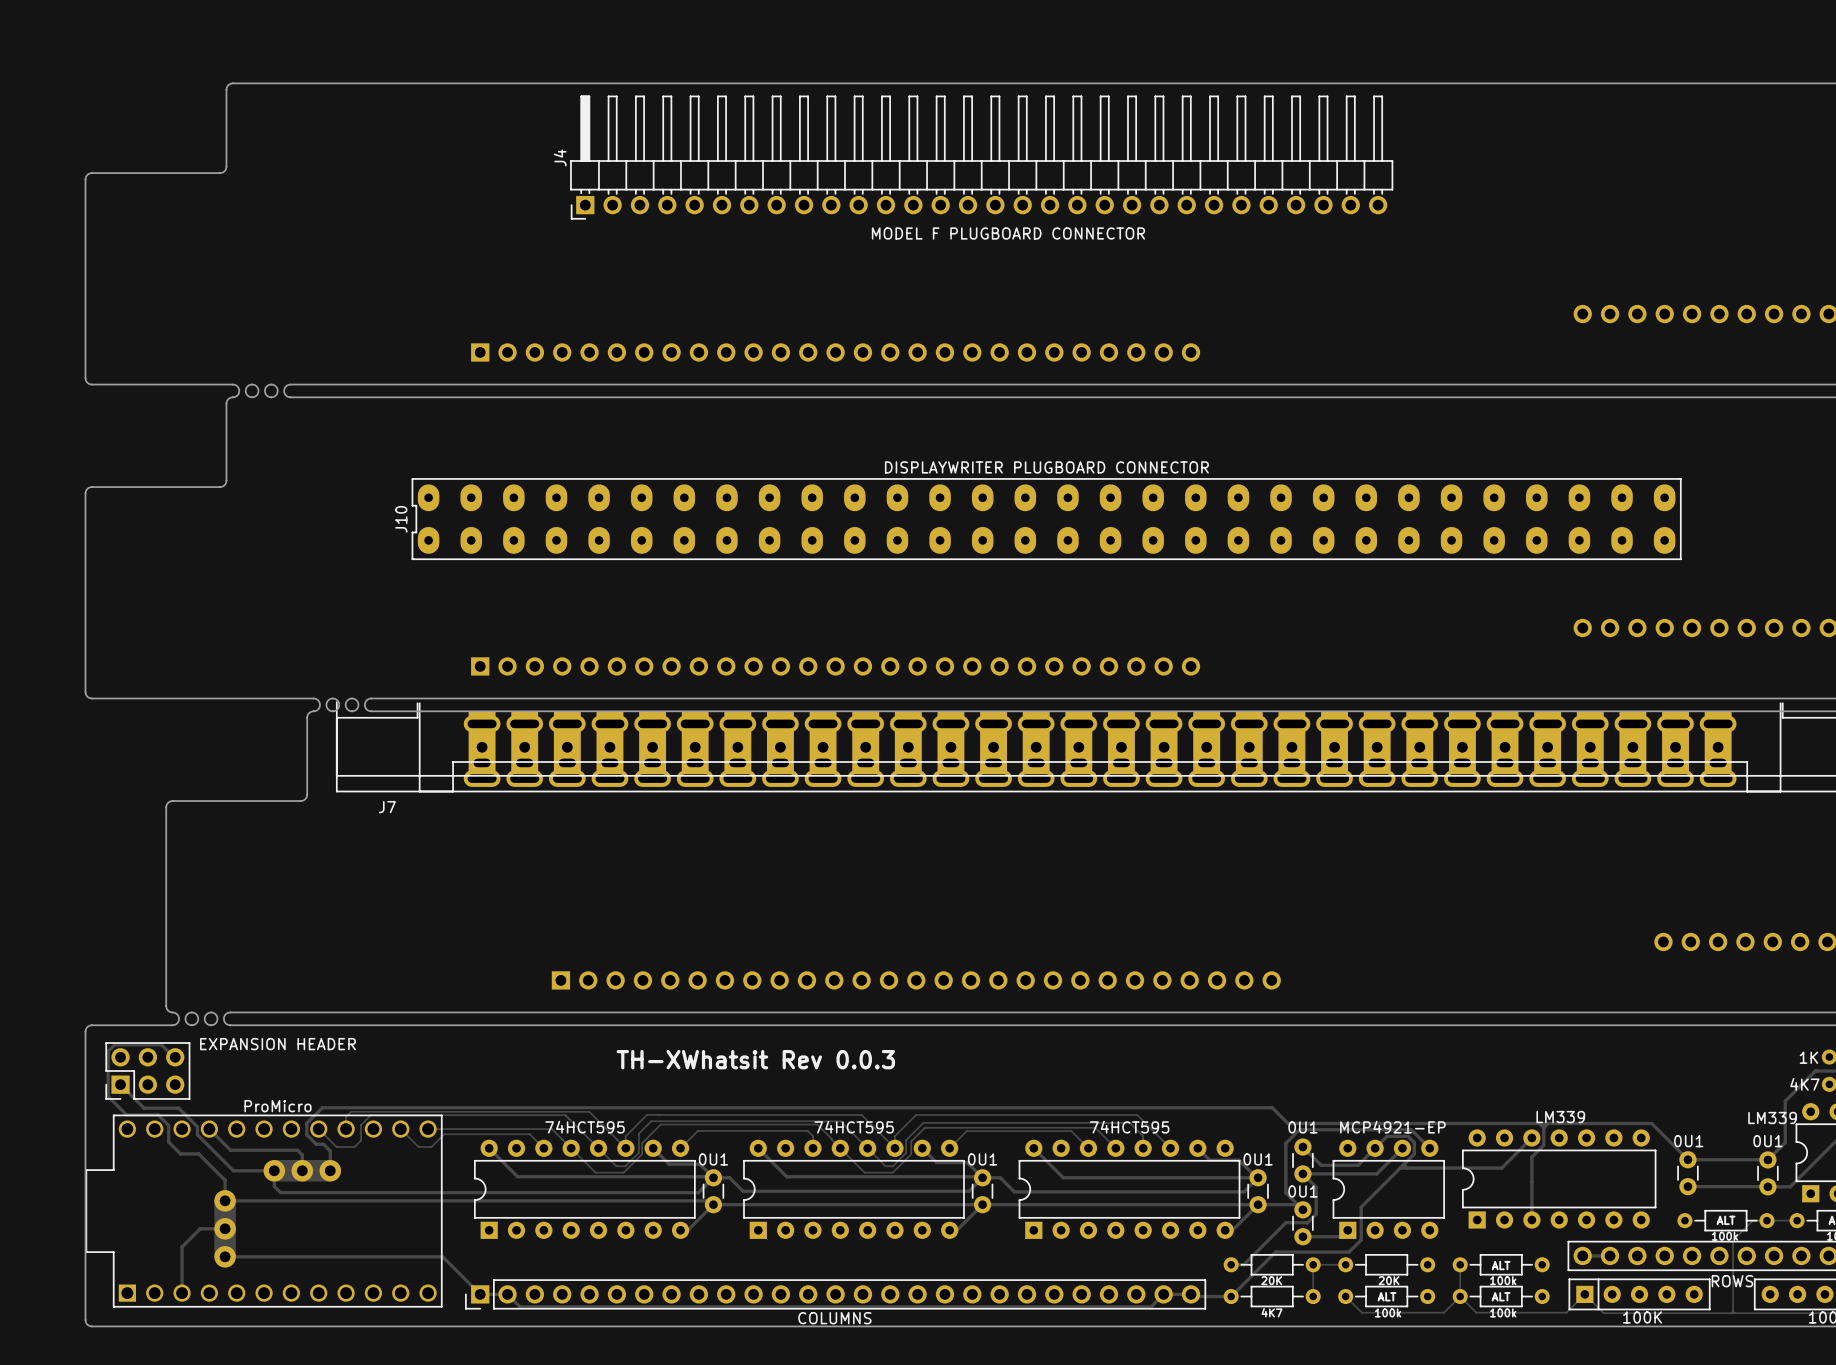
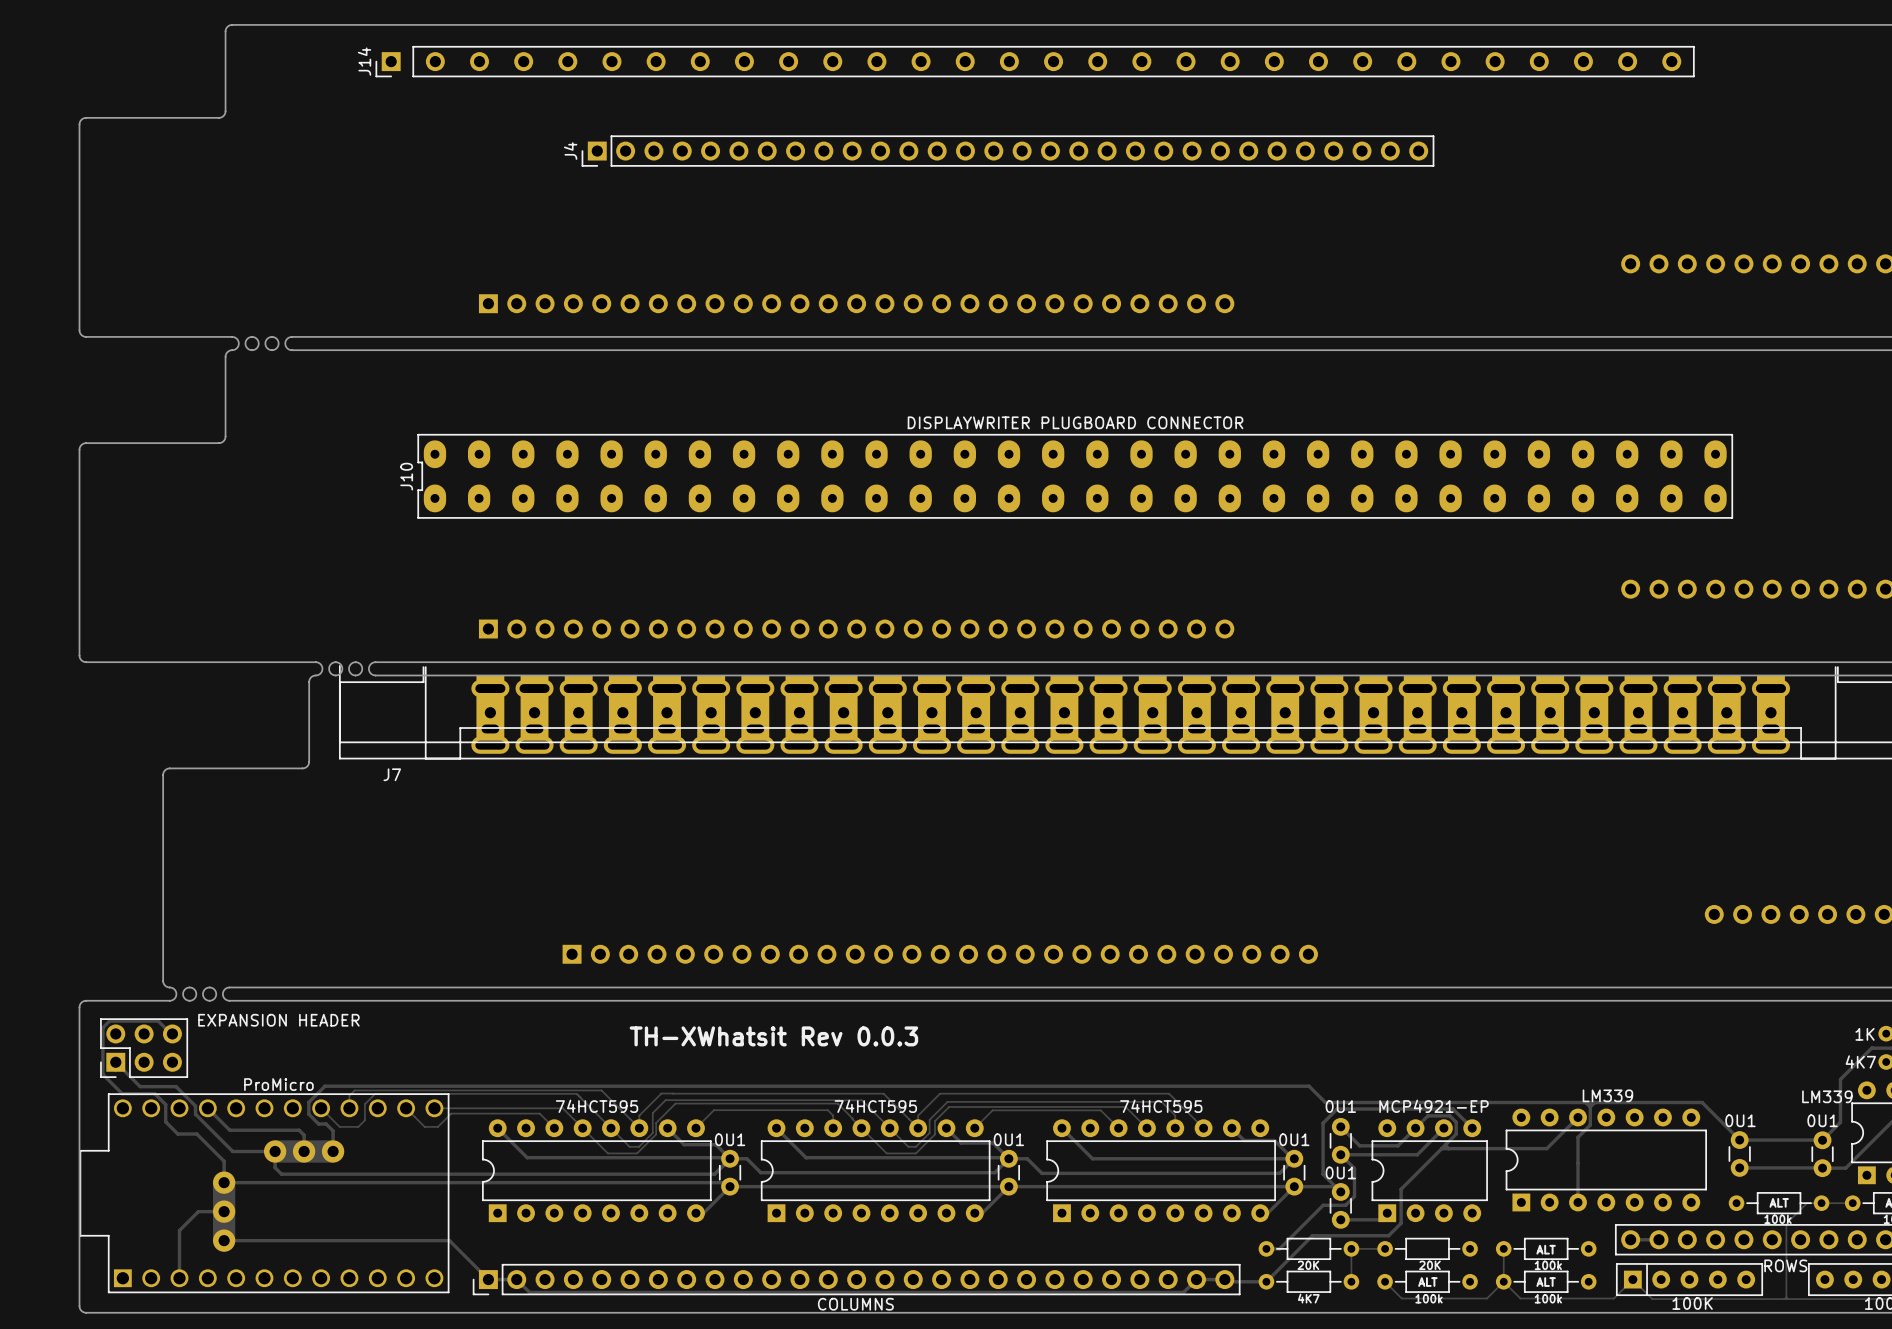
J4 footprint: [570, 95, 1394, 220] -> [581, 135, 1435, 167]
J14: none -> (1035, 61)
J4 value: MODEL F PLUGBOARD CONNECTOR (1008, 233) -> none

